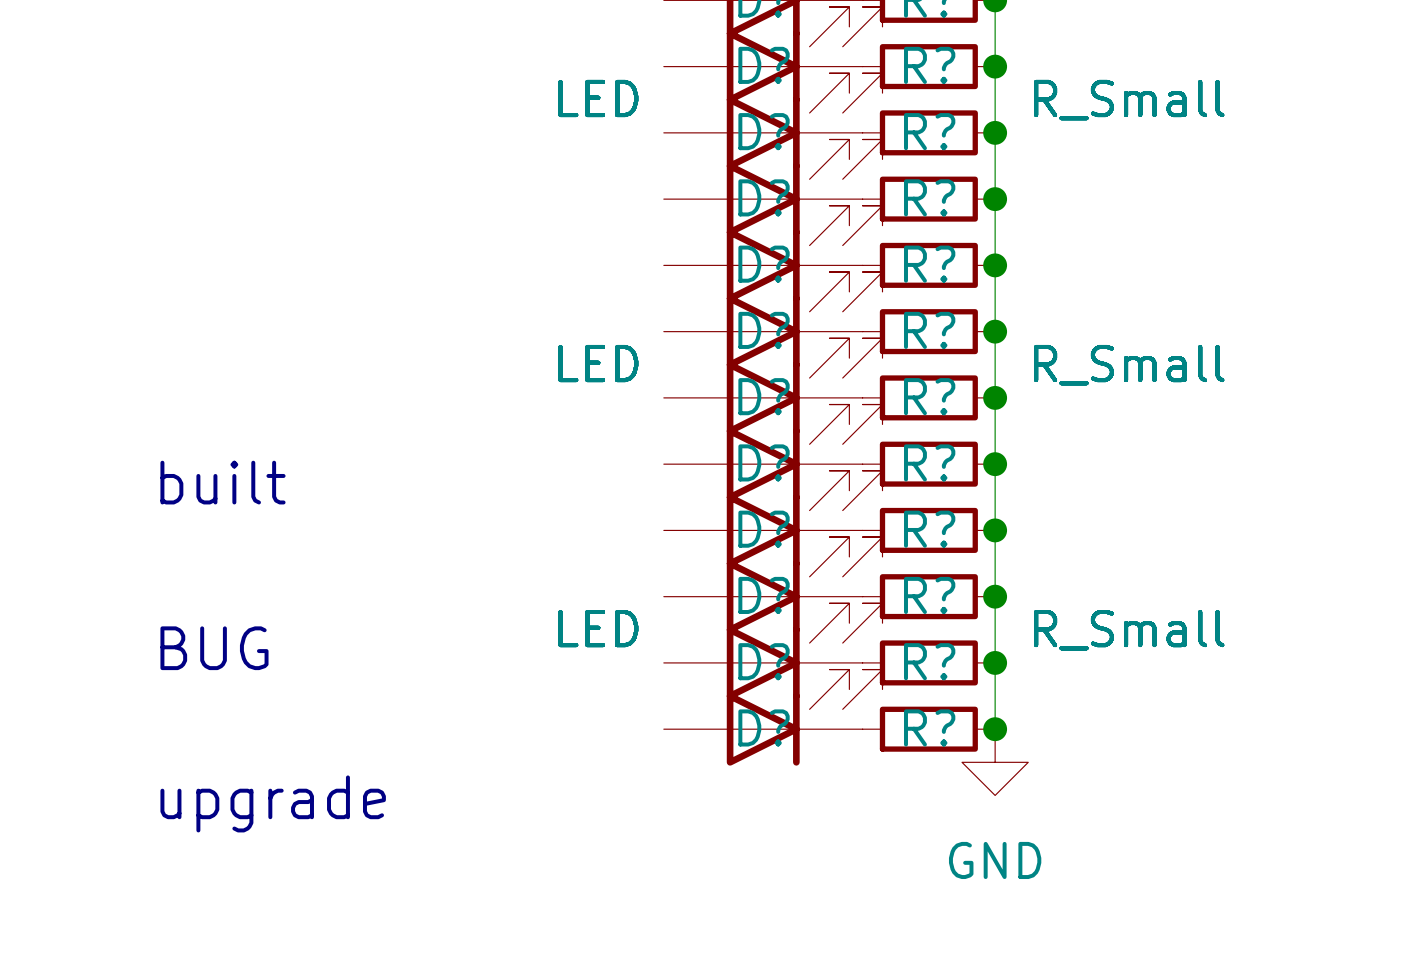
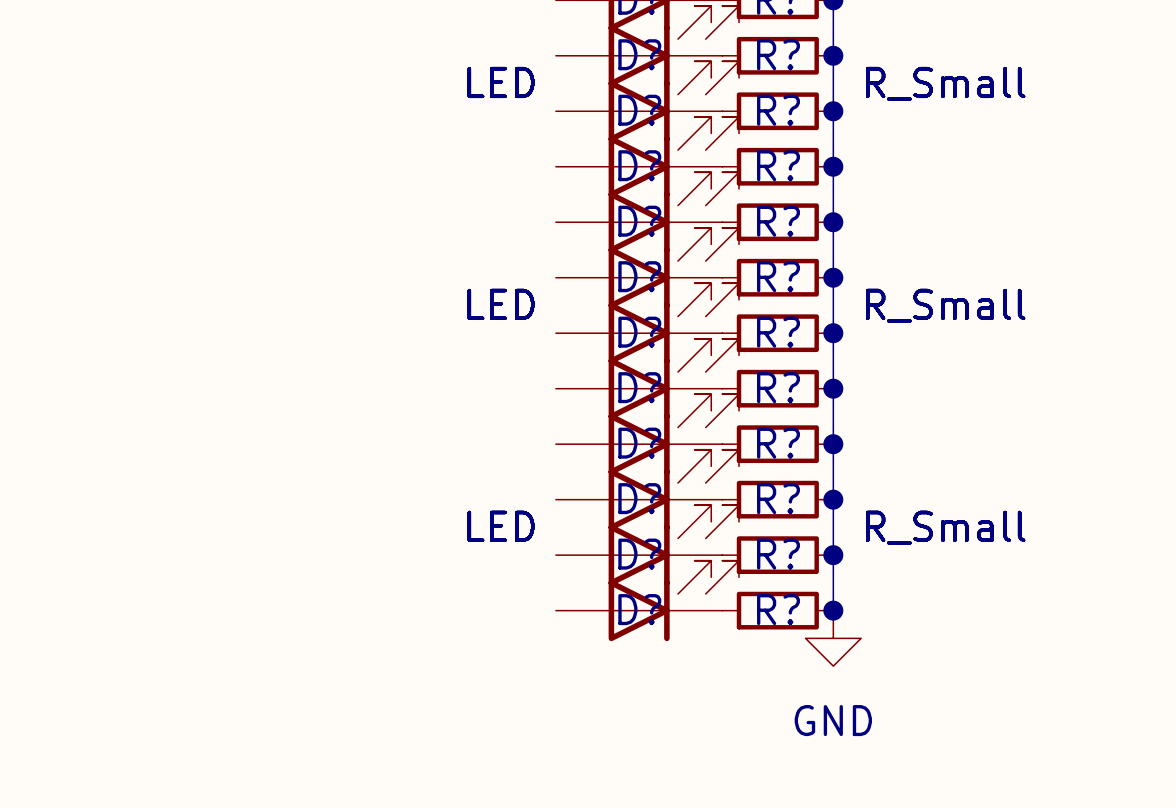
text: built (223, 482) -> none
text: BUG (214, 648) -> none
text: upgrade (273, 803) -> none

